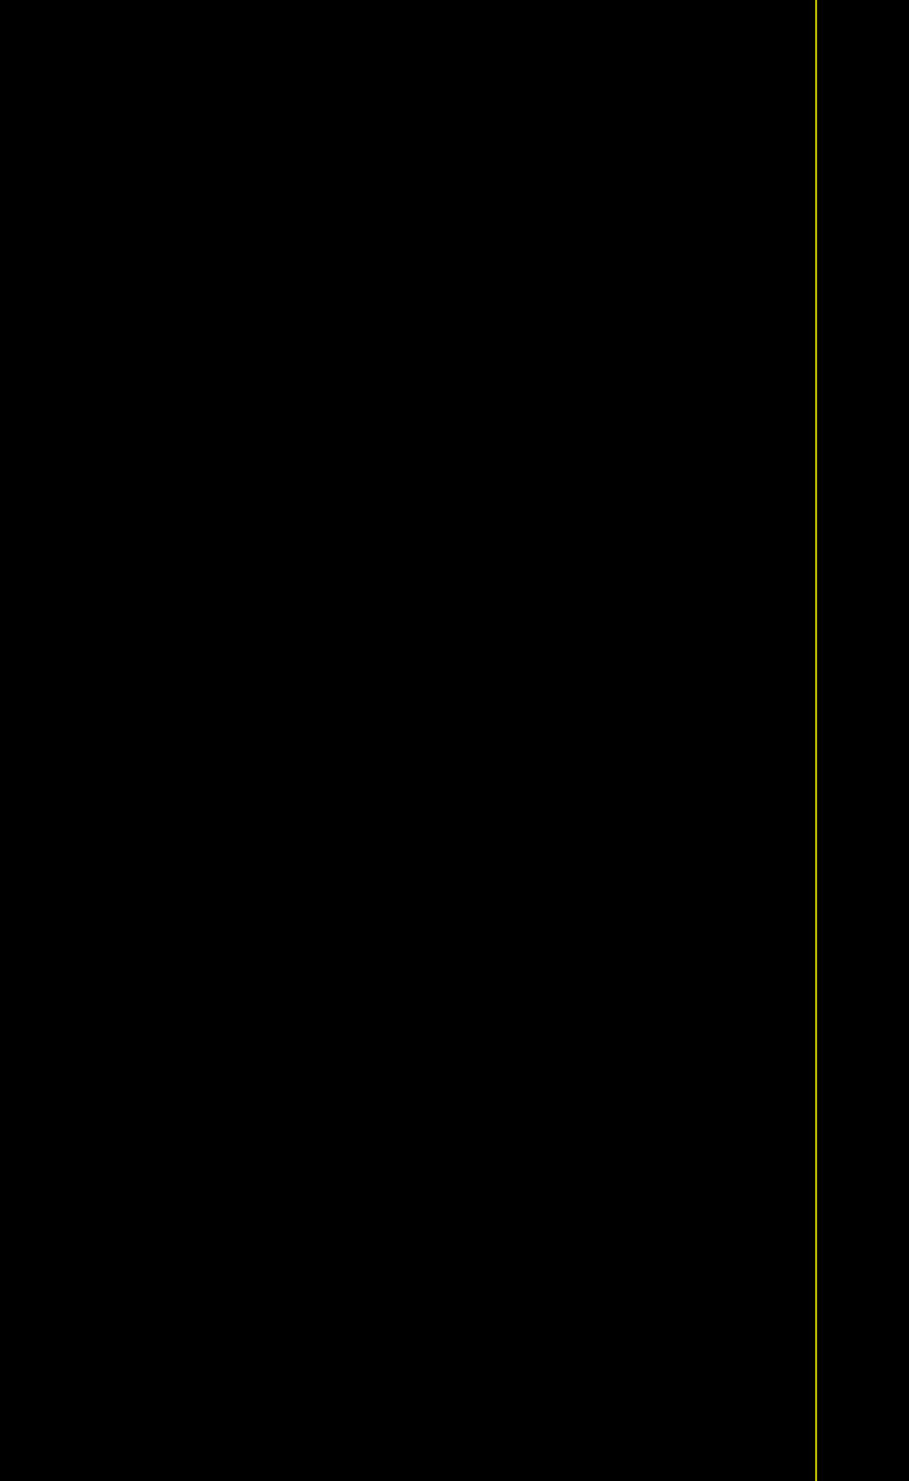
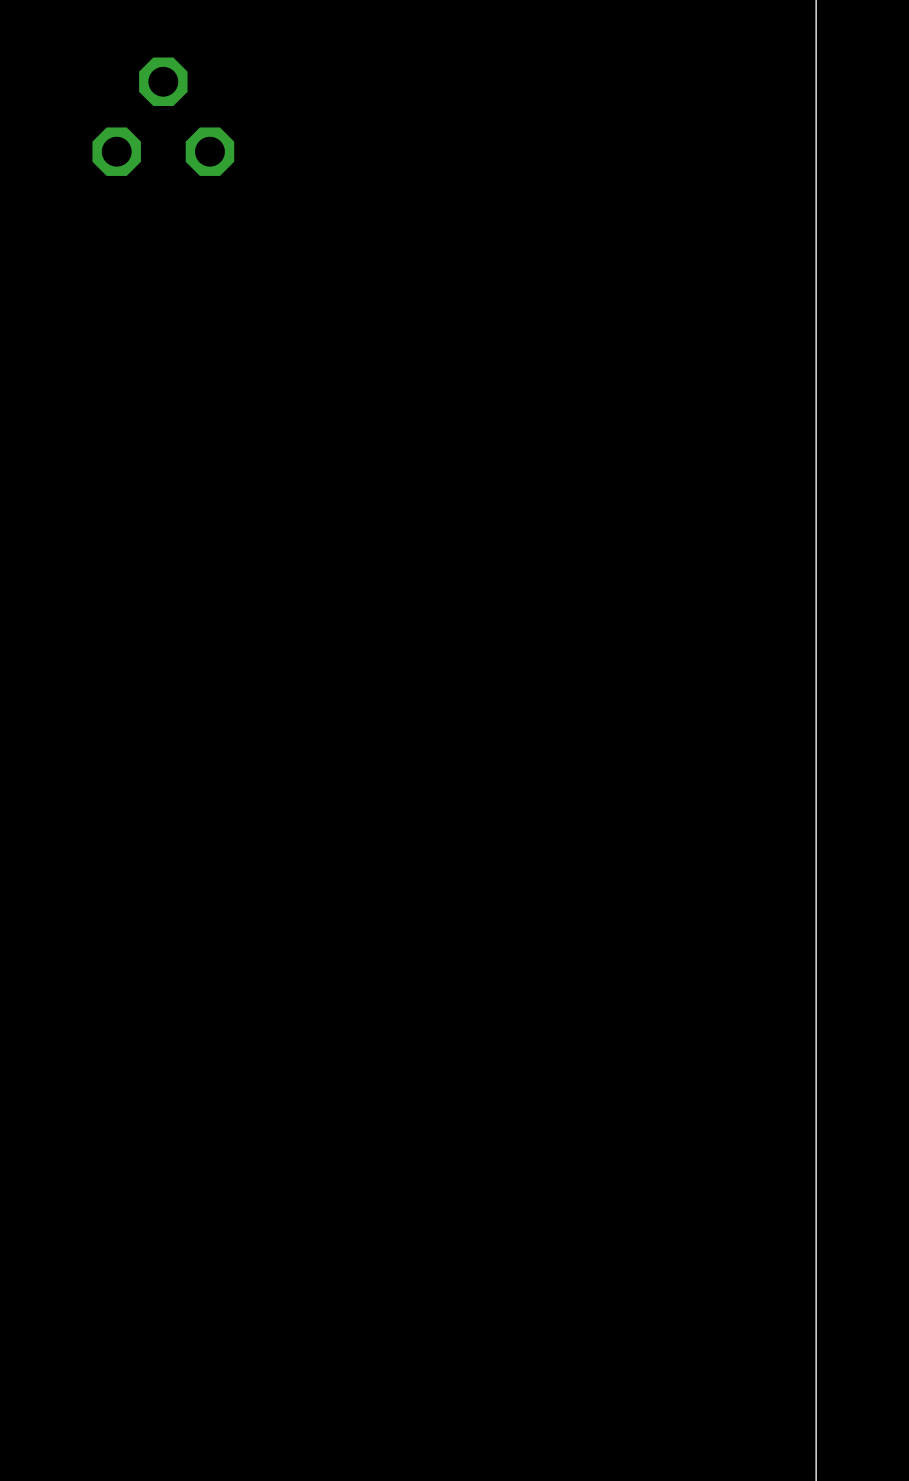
part: none -> (163, 116)

